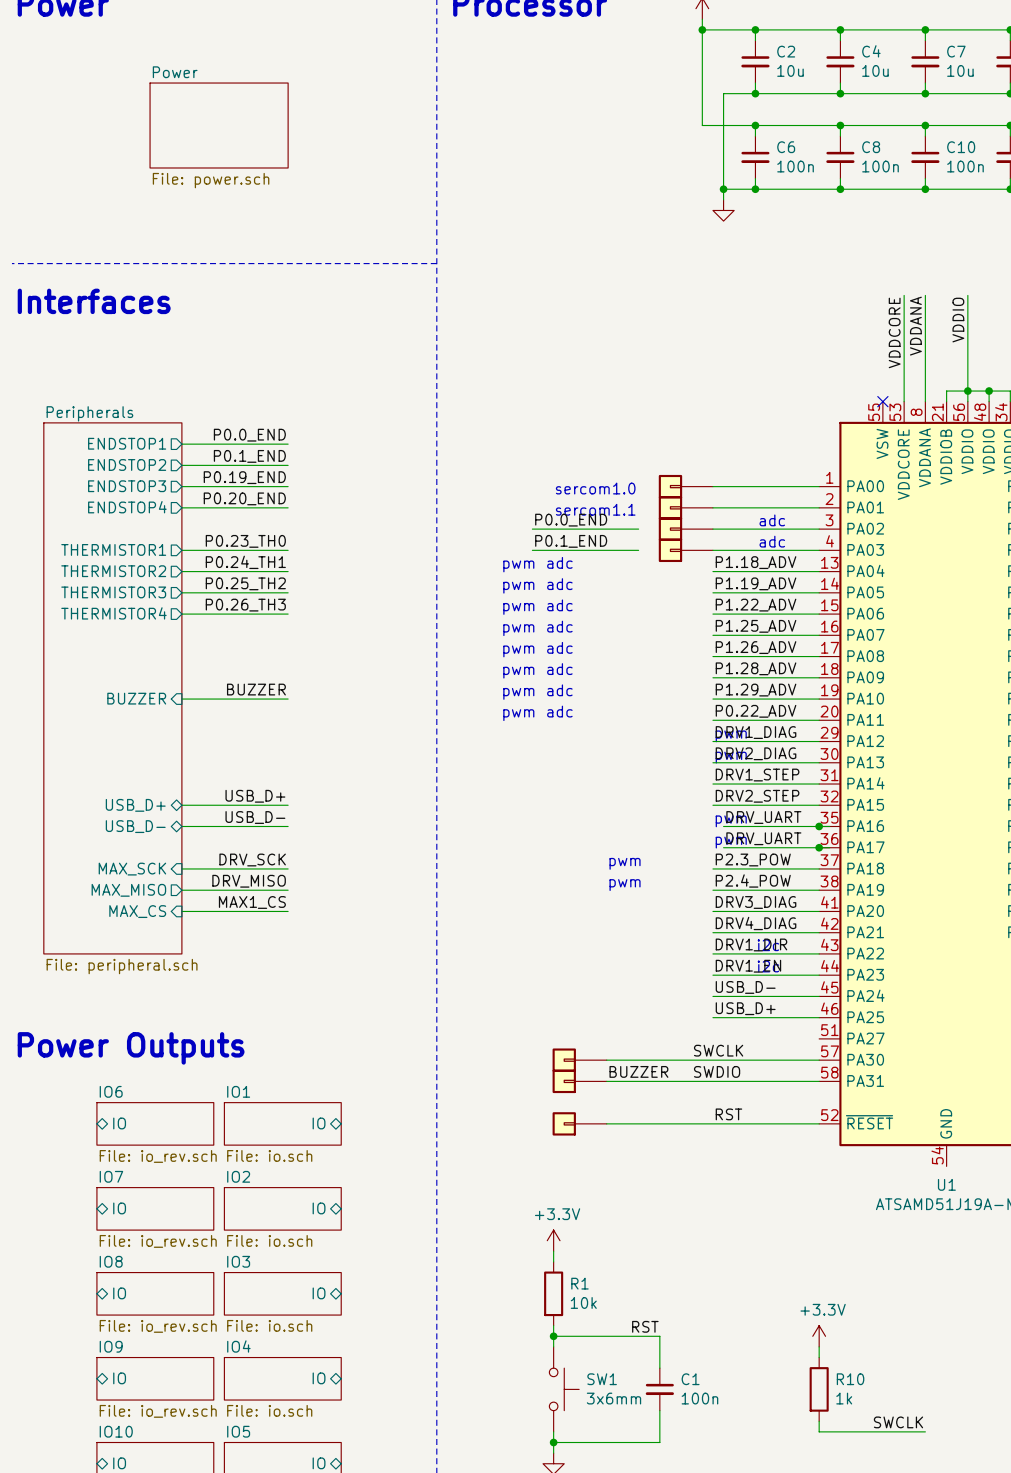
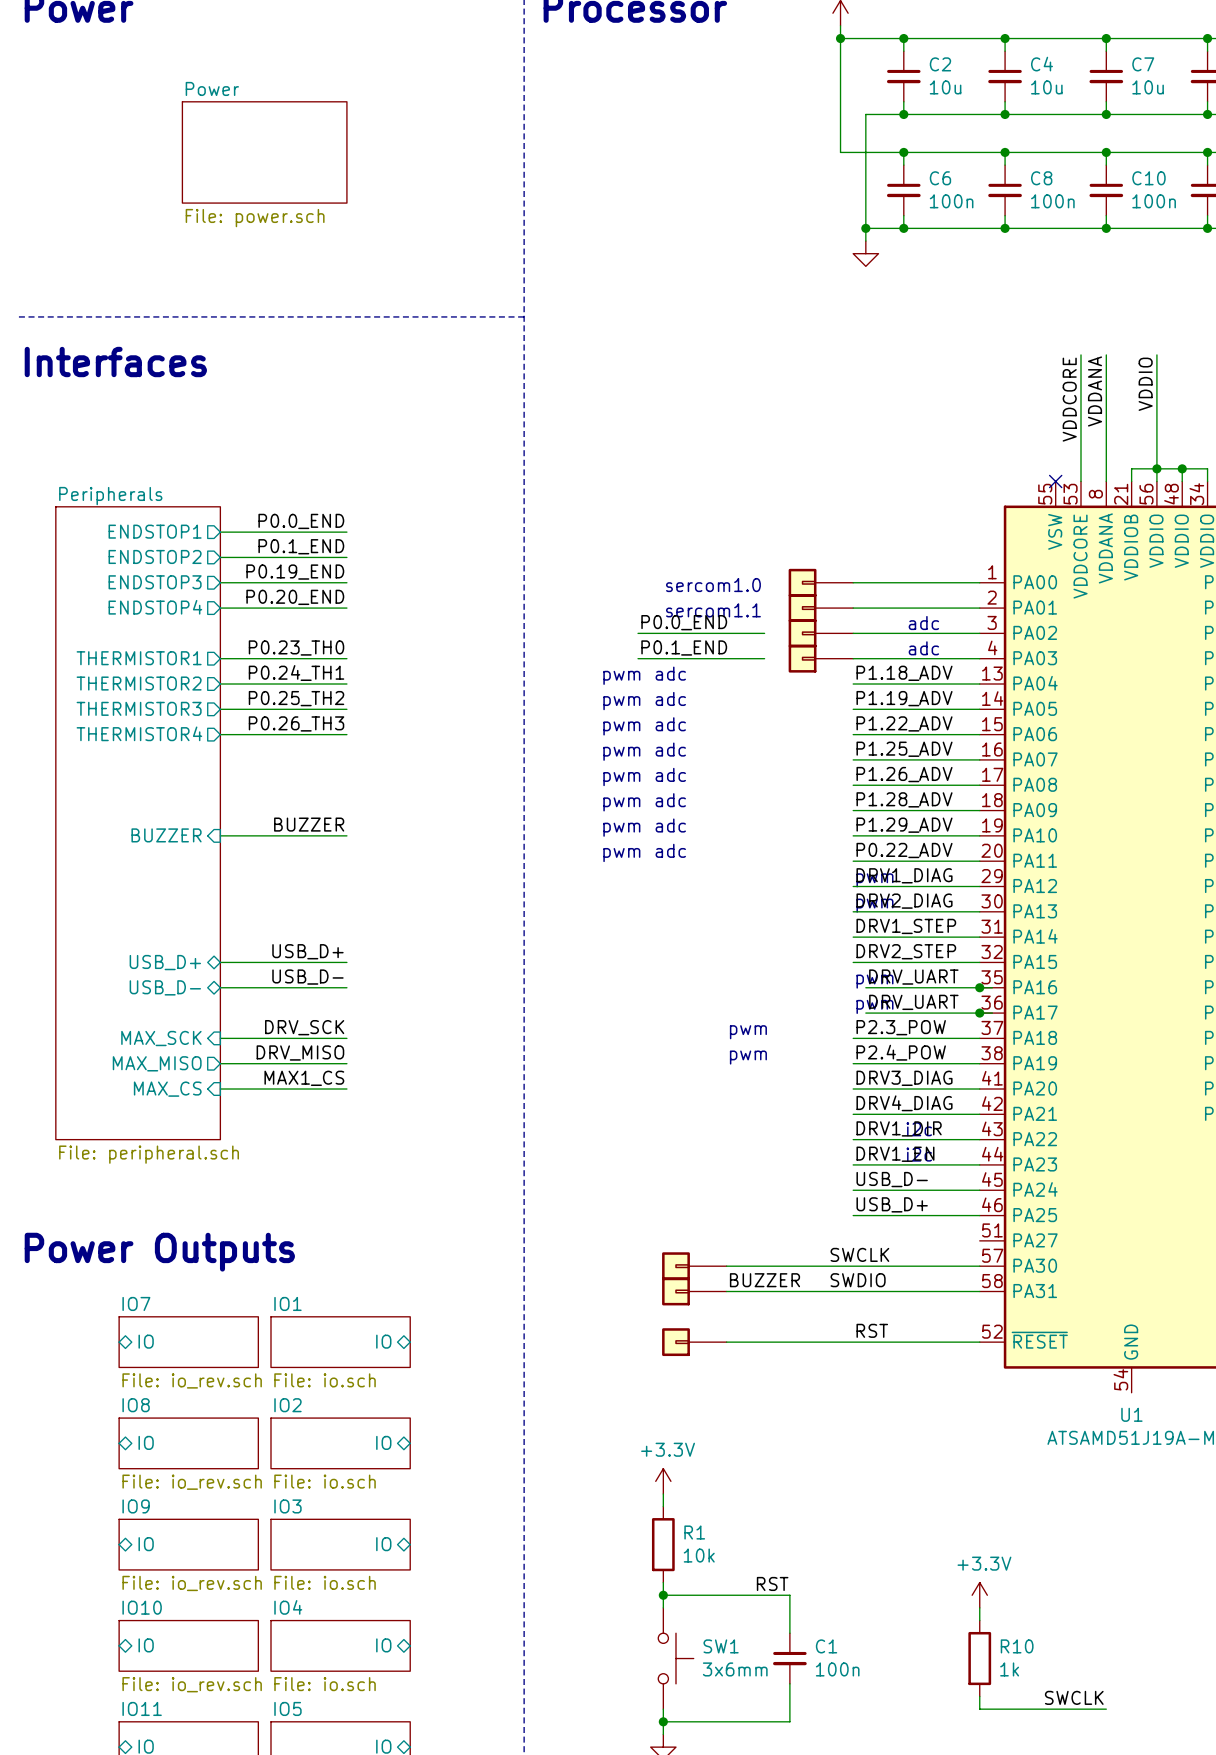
sheet IO6 name: IO6 (111, 1091) -> IO7 (136, 1303)
sheet IO7 name: IO7 (111, 1176) -> IO8 (136, 1405)
sheet IO8 name: IO8 (111, 1261) -> IO9 (136, 1506)
sheet IO9 name: IO9 (111, 1346) -> IO10 (142, 1607)
sheet IO10 name: IO10 (116, 1431) -> IO11 (142, 1708)

